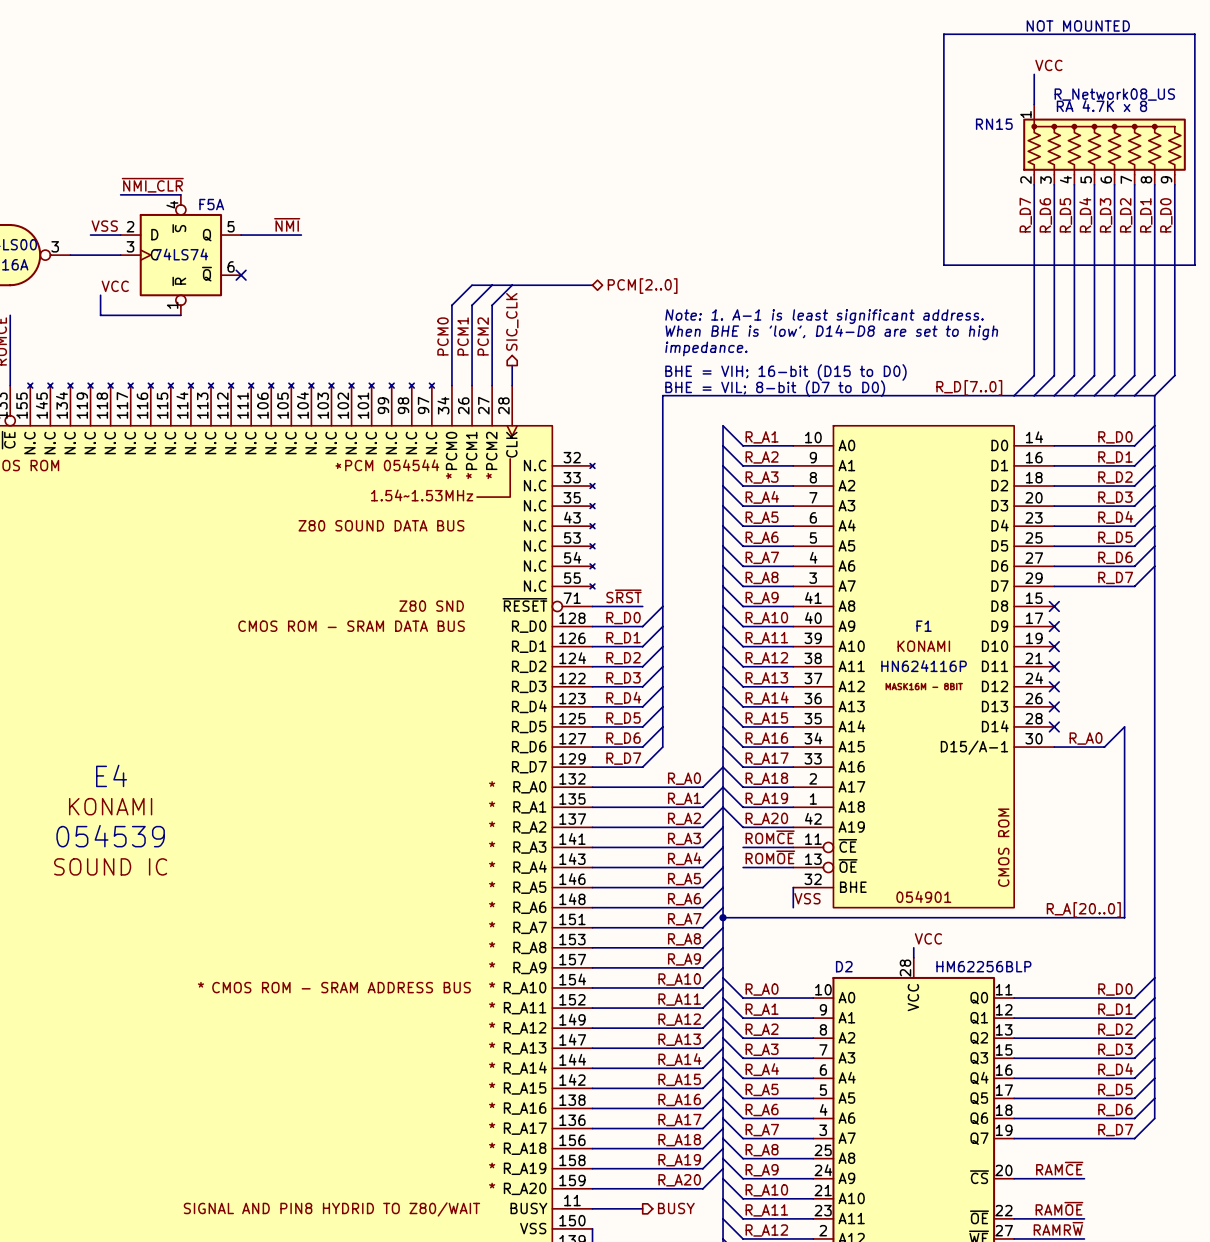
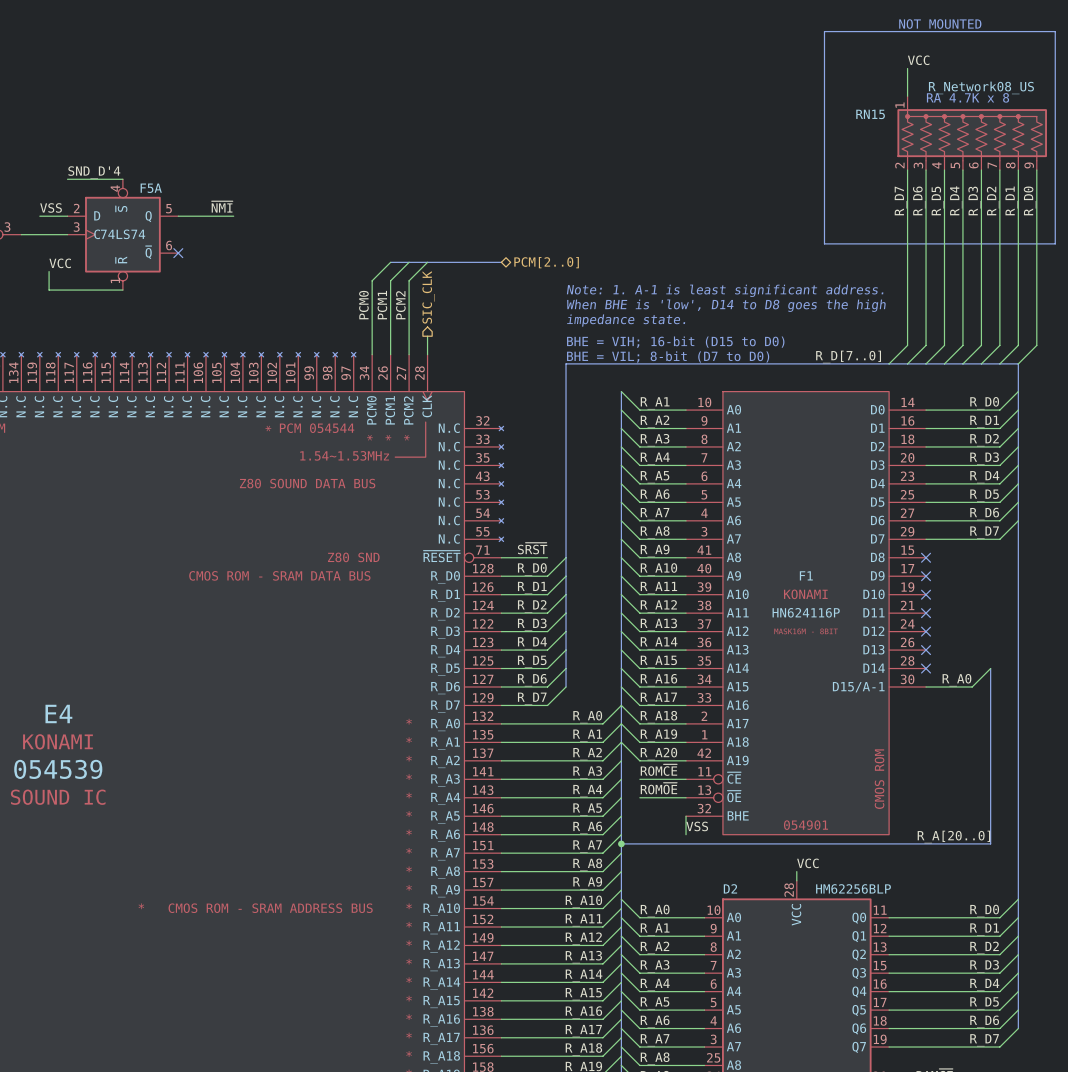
label: ~{NMI_CLR} (152, 185) -> SND_D'4 (94, 172)
text: When BHE is 'low', D14-D8 are set to high (831, 332) -> When BHE is 'low', D14 to D8 goes the high (726, 305)
text: impedance. (706, 348) -> impedance state. (626, 320)

